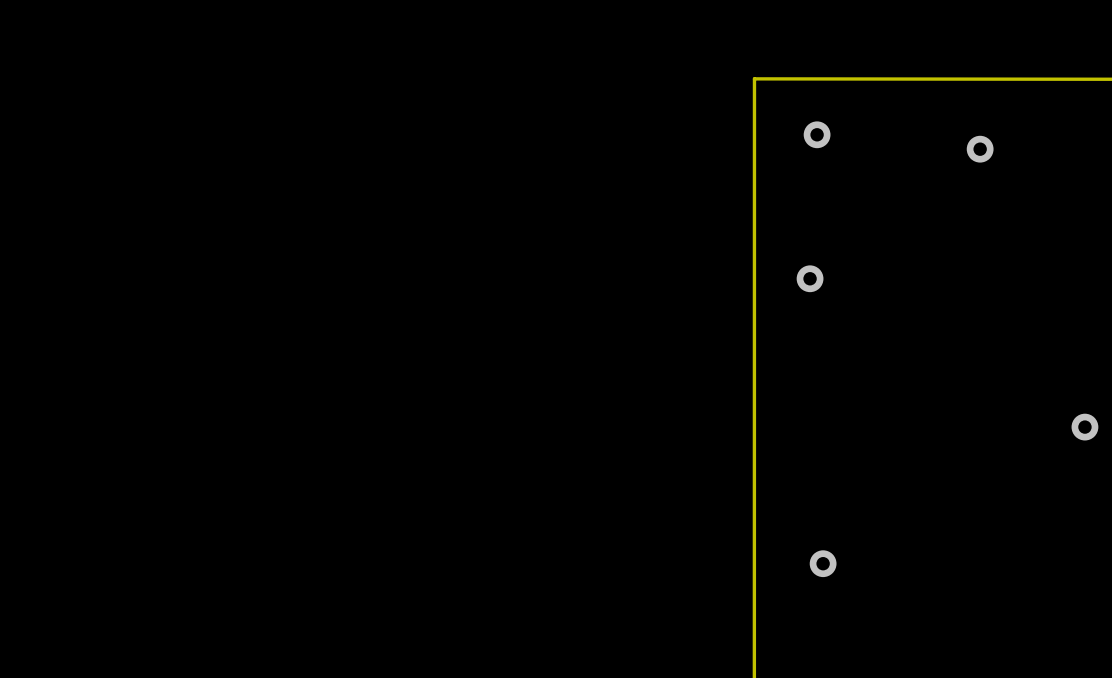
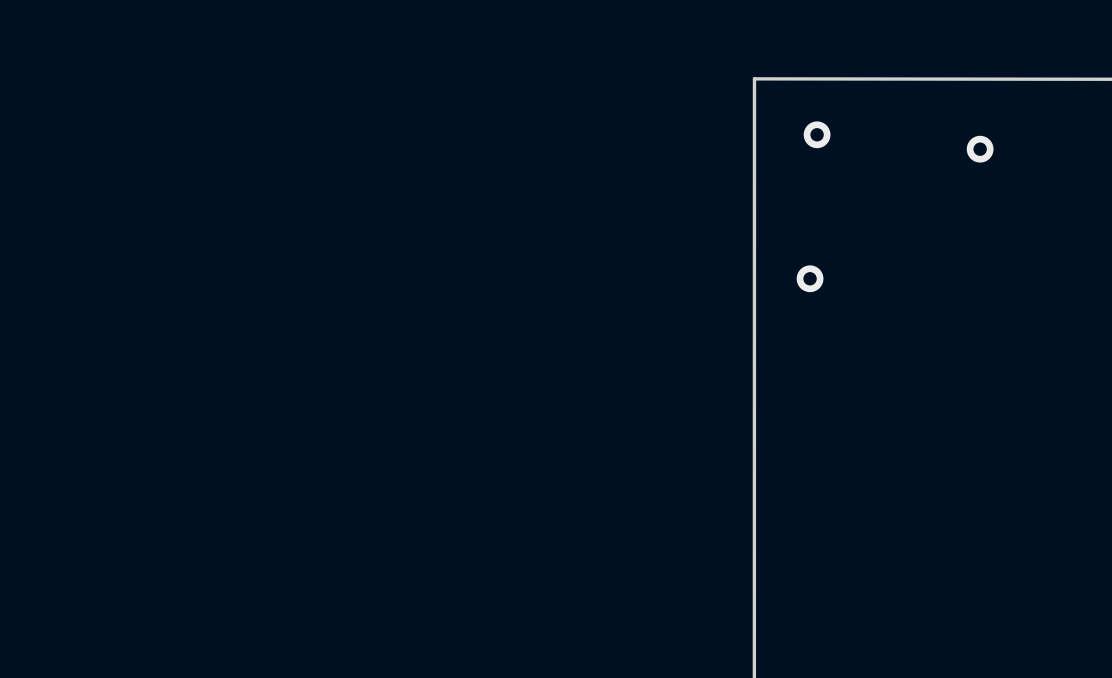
via: (1084, 427) -> none
via: (823, 563) -> none

